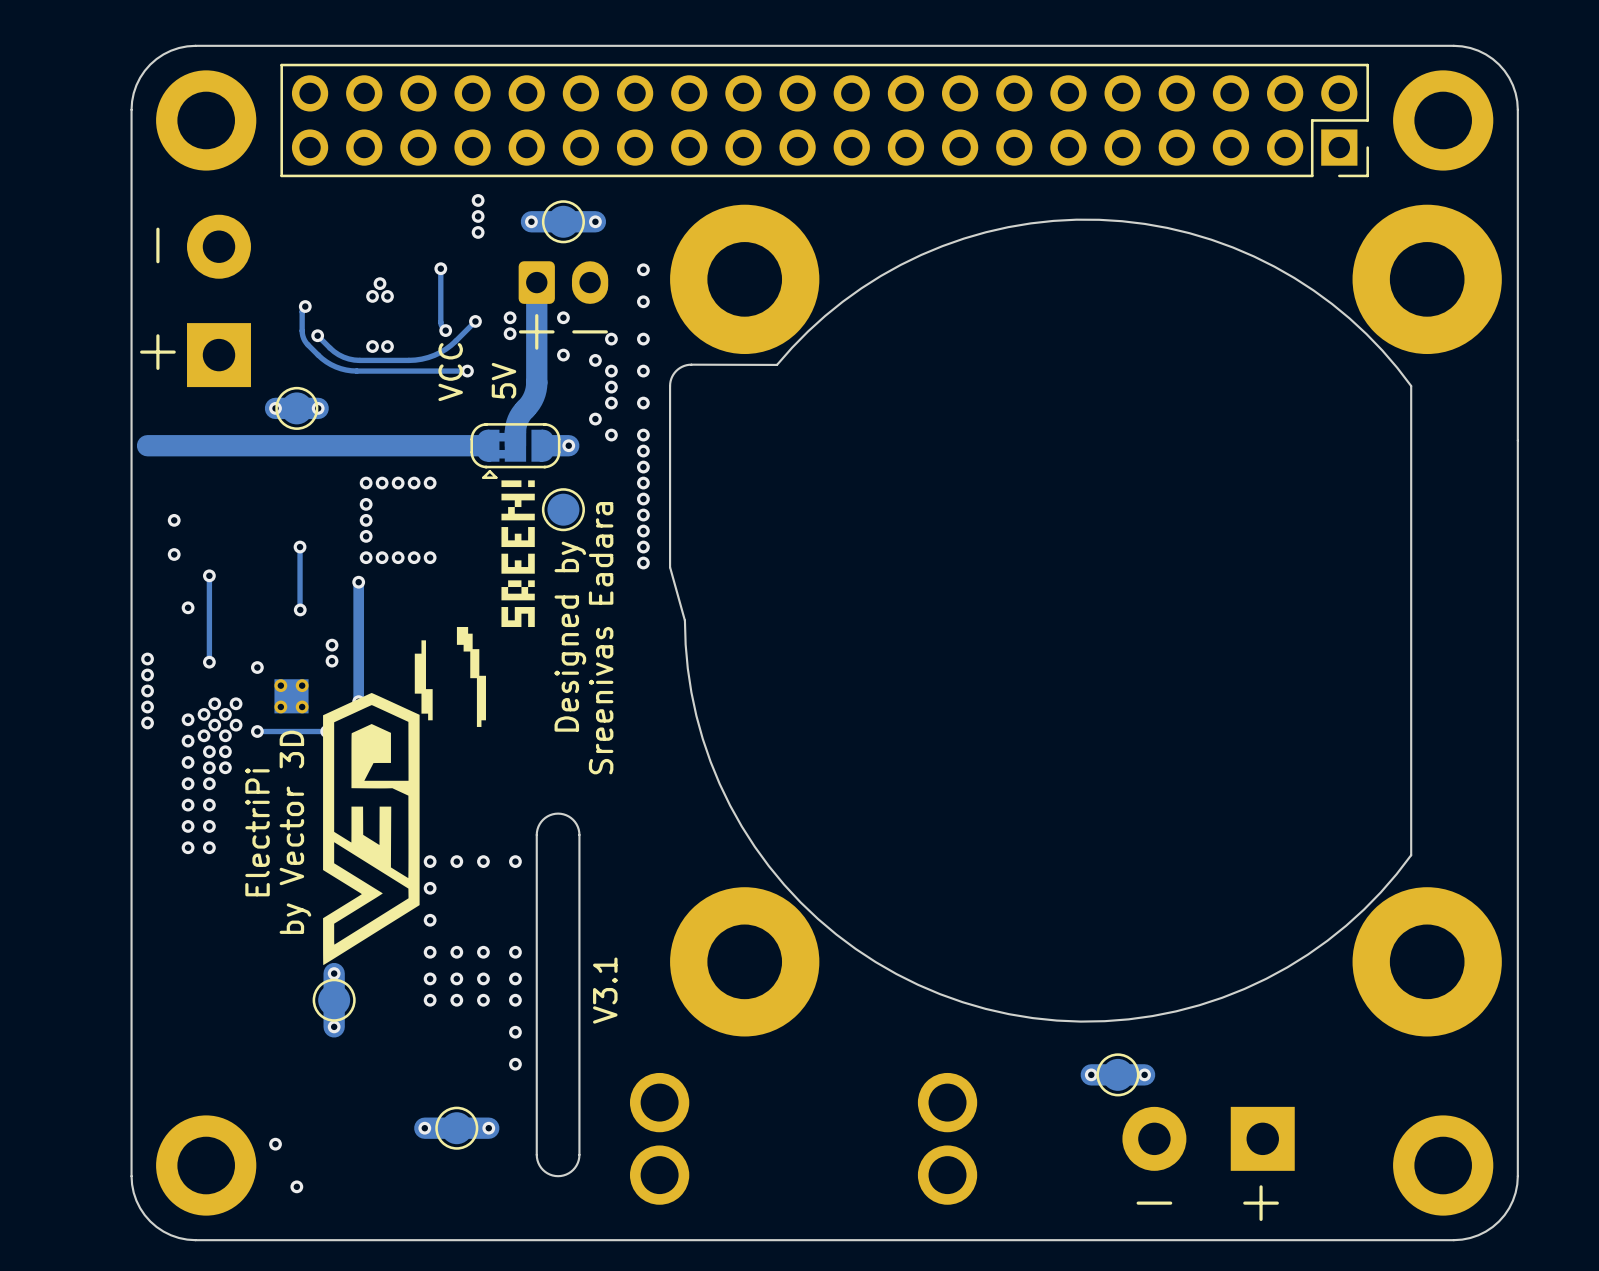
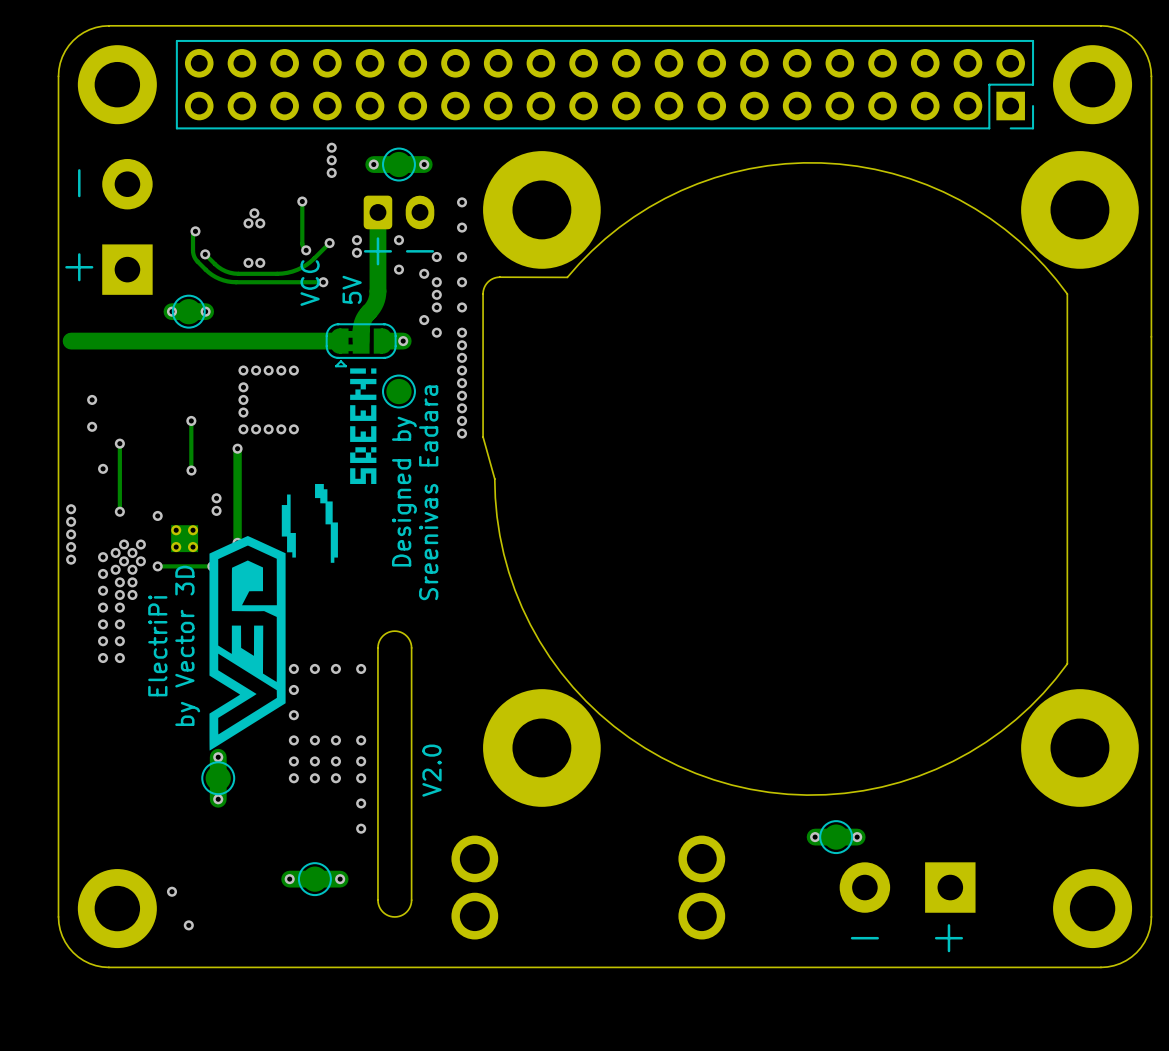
text: V3.1 (605, 990) -> V2.0 (431, 770)

